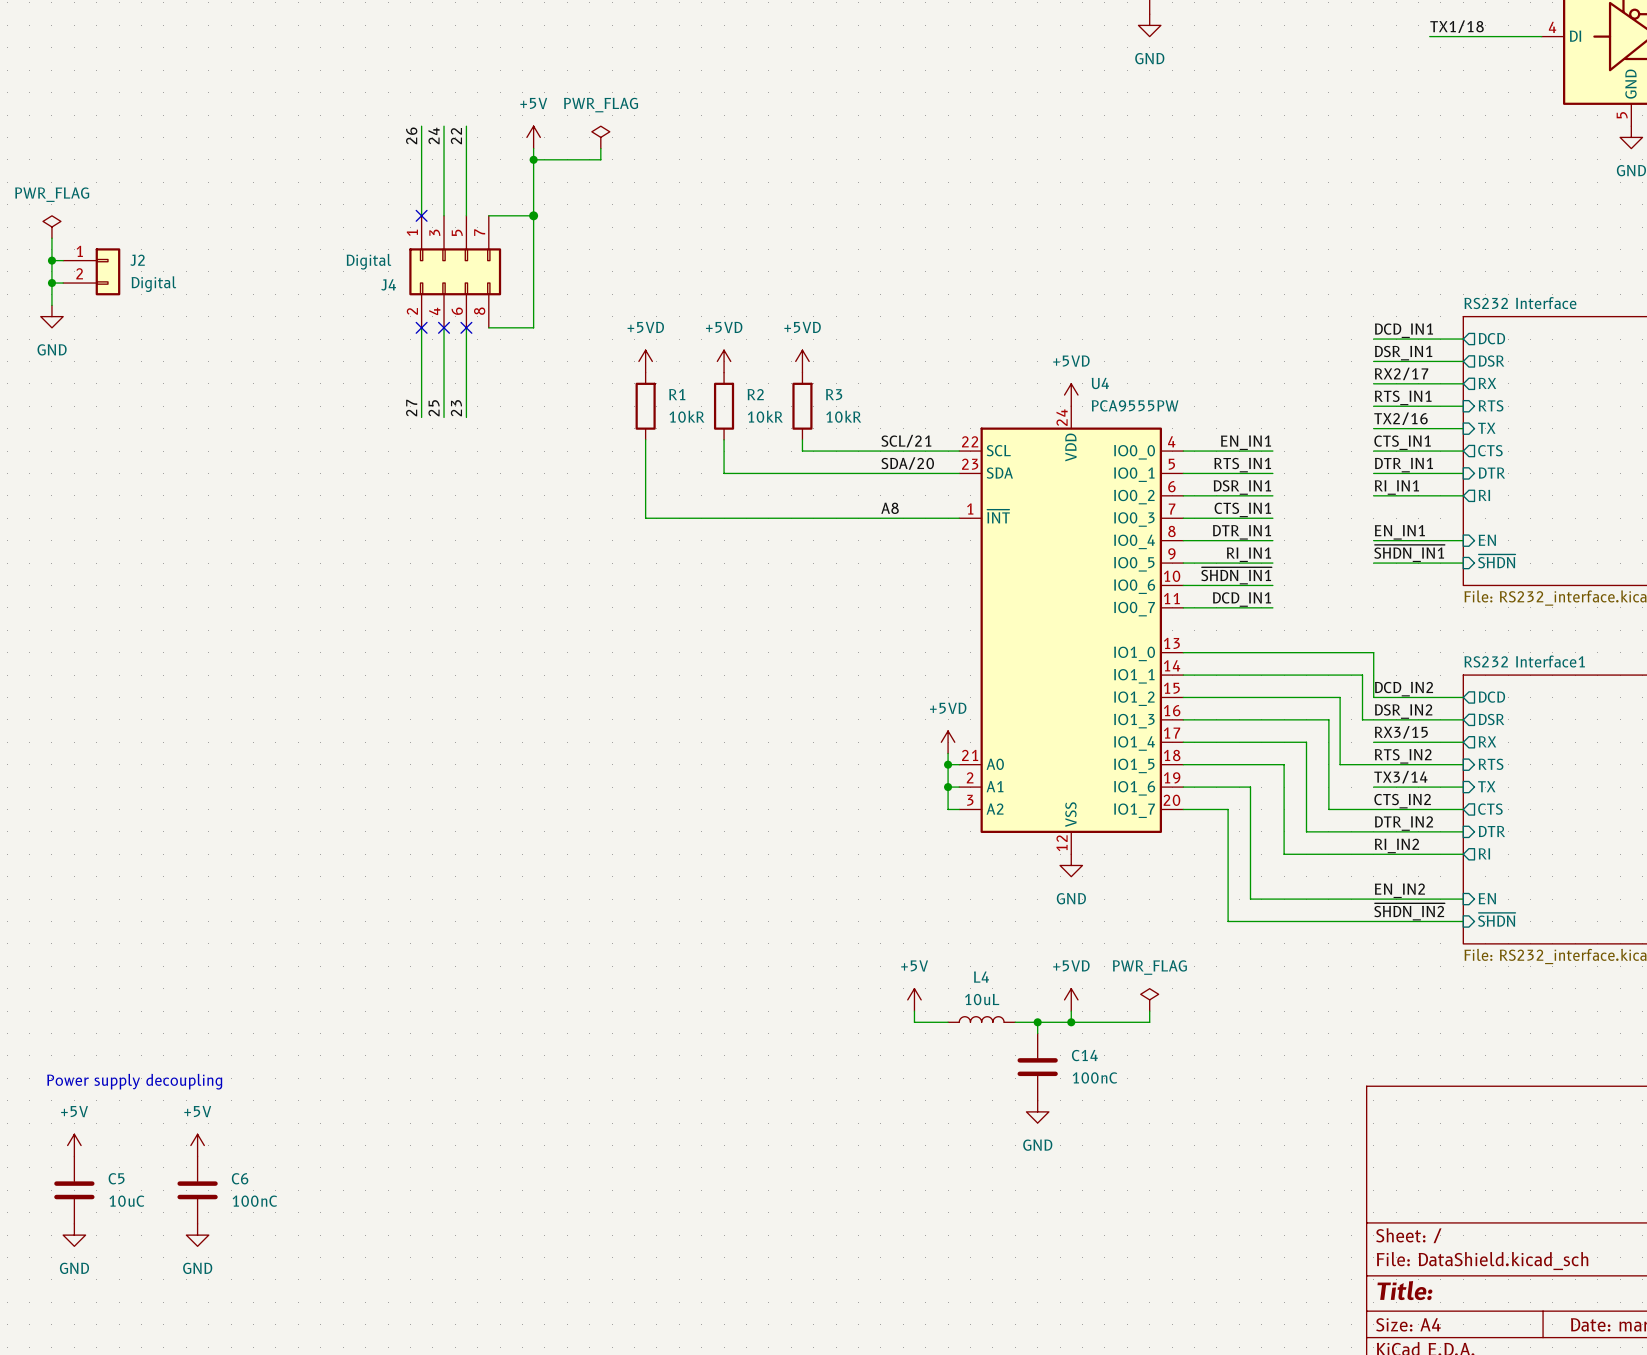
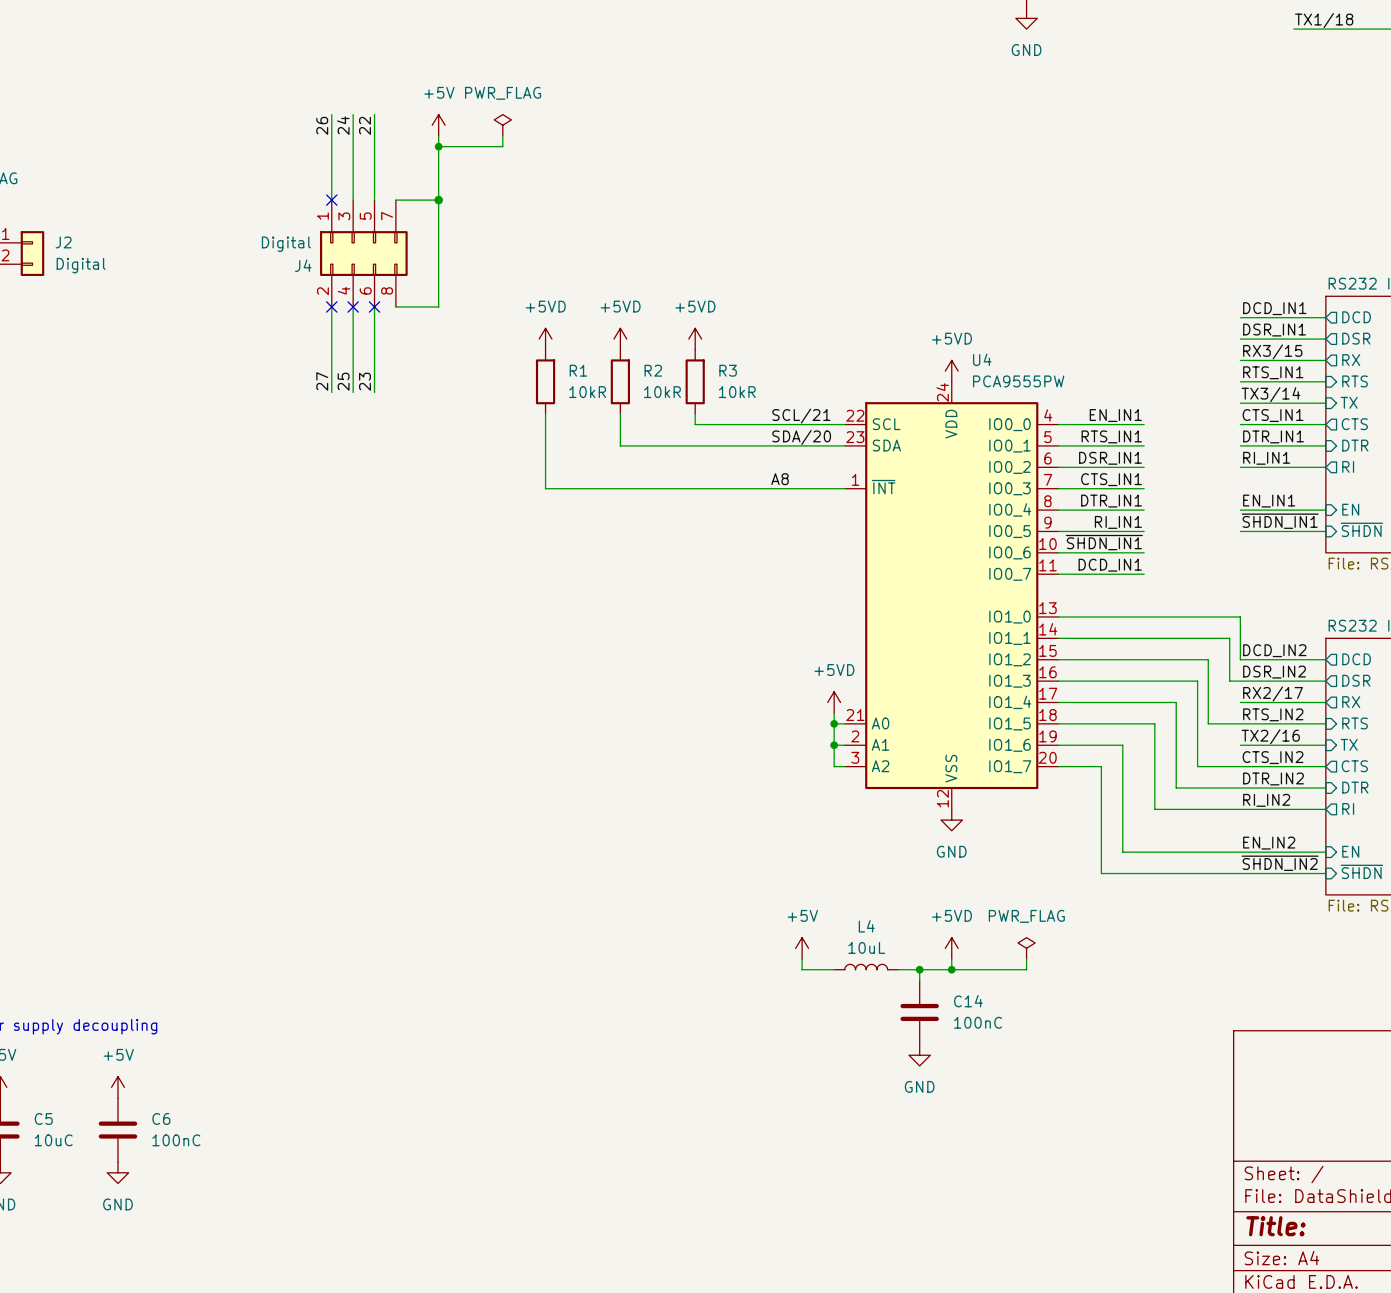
label: RX2/17 (1401, 373) -> RX3/15 (1272, 351)
label: TX2/16 (1400, 418) -> TX3/14 (1270, 394)
label: RX3/15 (1401, 732) -> RX2/17 (1273, 693)
label: TX3/14 (1400, 777) -> TX2/16 (1270, 736)

